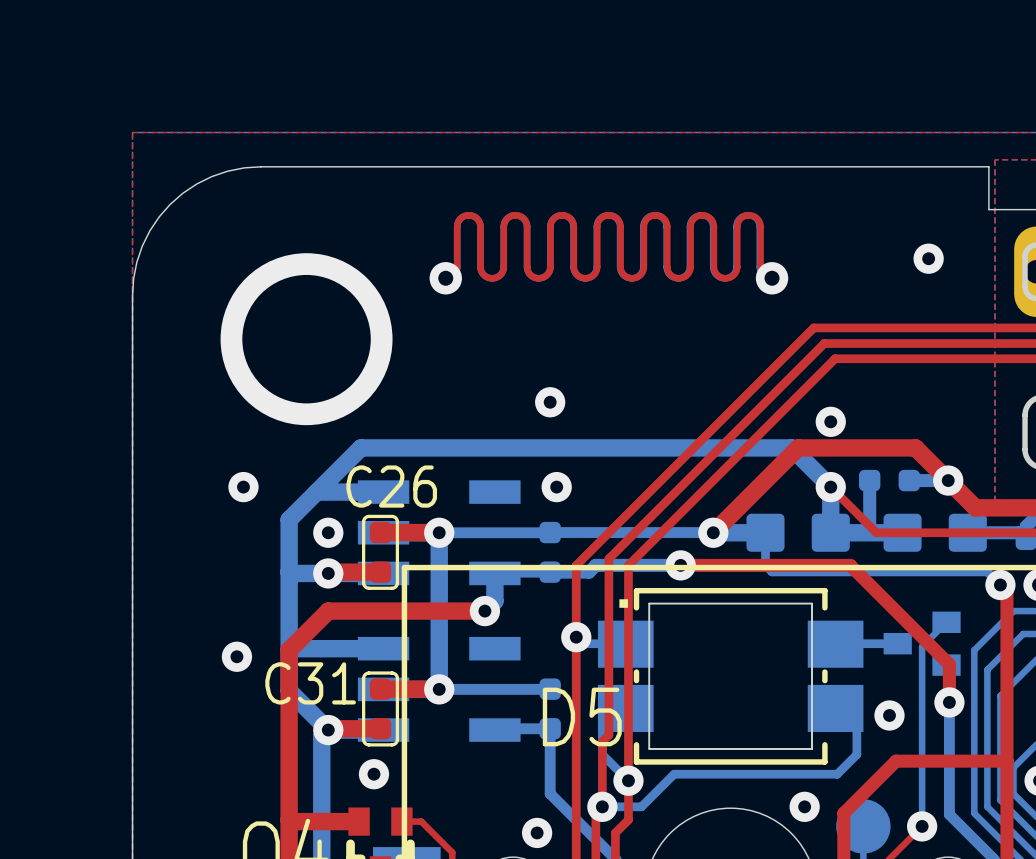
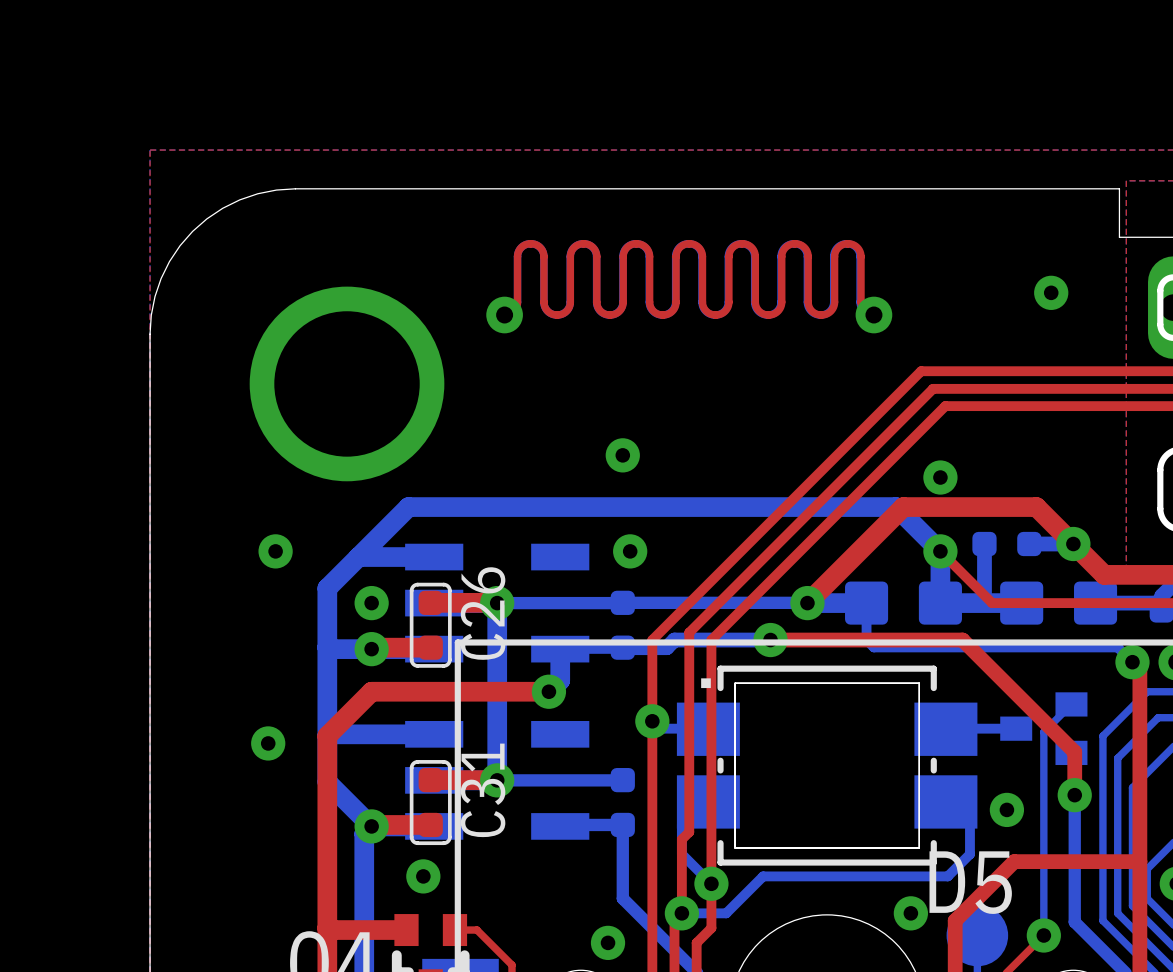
C26 name rotation: 0° (391, 486) -> 90° counterclockwise (483, 613)
C31 name rotation: 0° (310, 683) -> 90° counterclockwise (483, 790)
C31 name position: C31 (310, 683) -> C31 (483, 790)
D5 name position: D5 (582, 716) -> D5 (970, 882)

